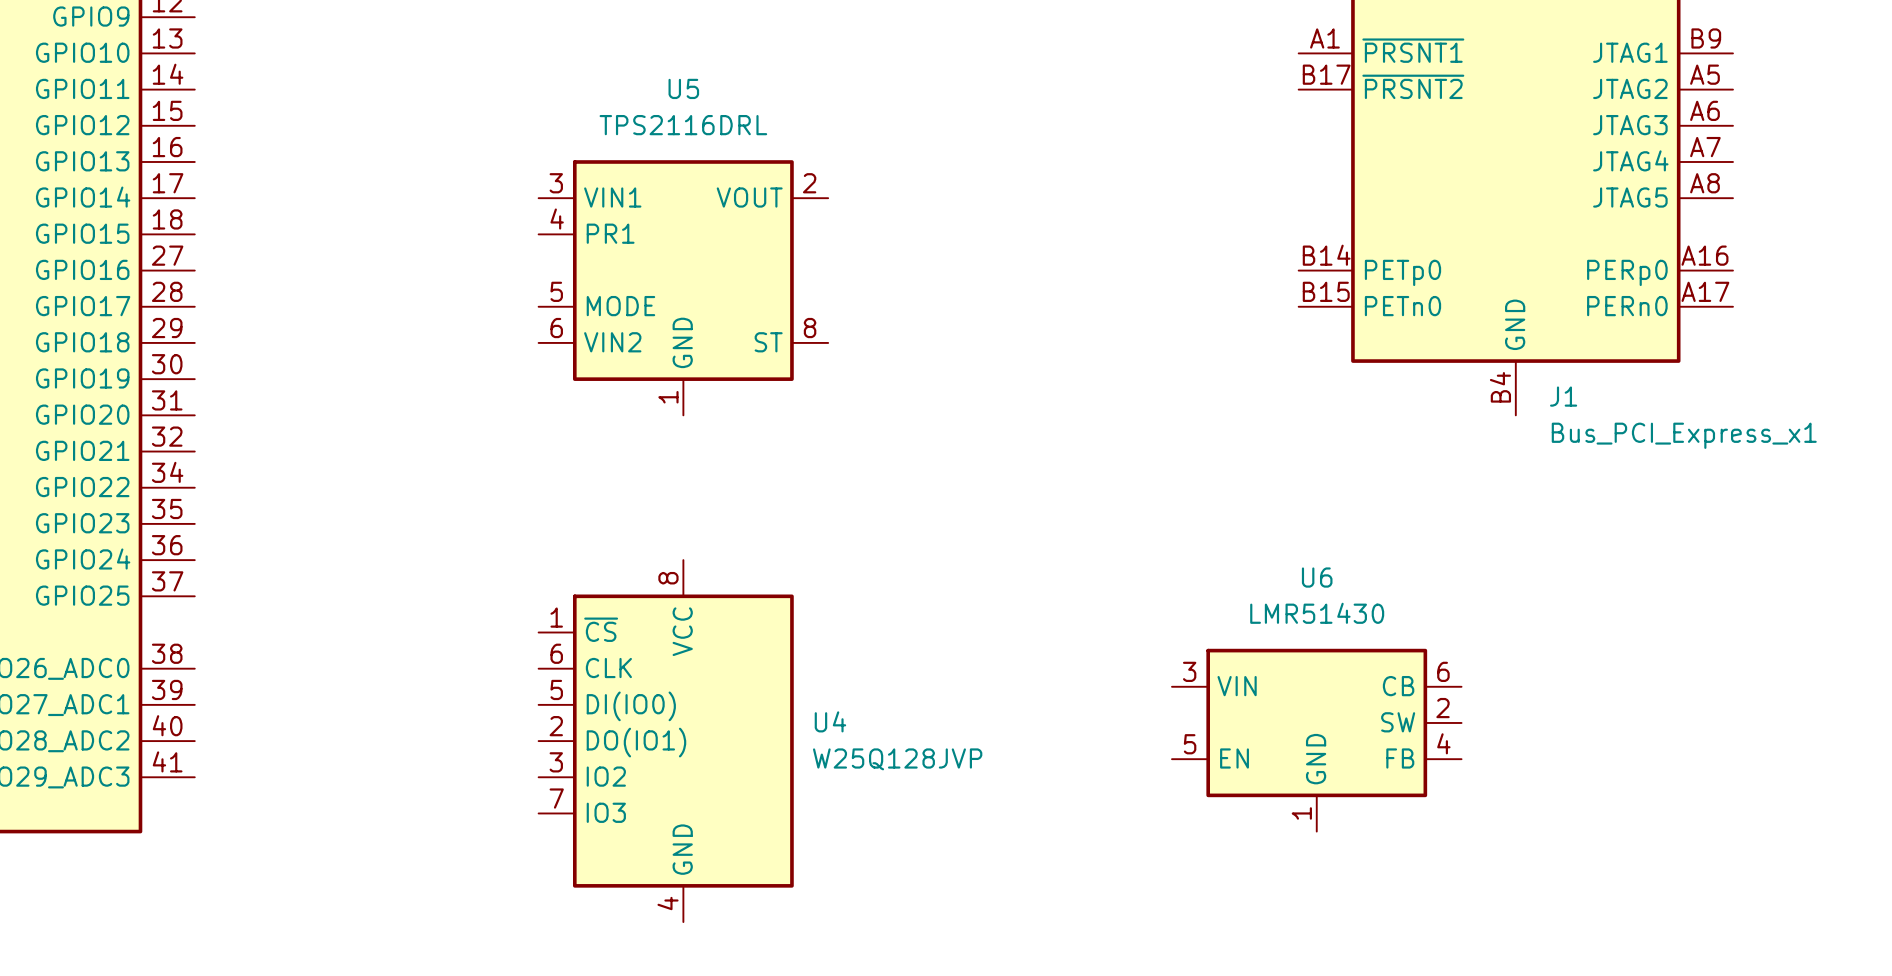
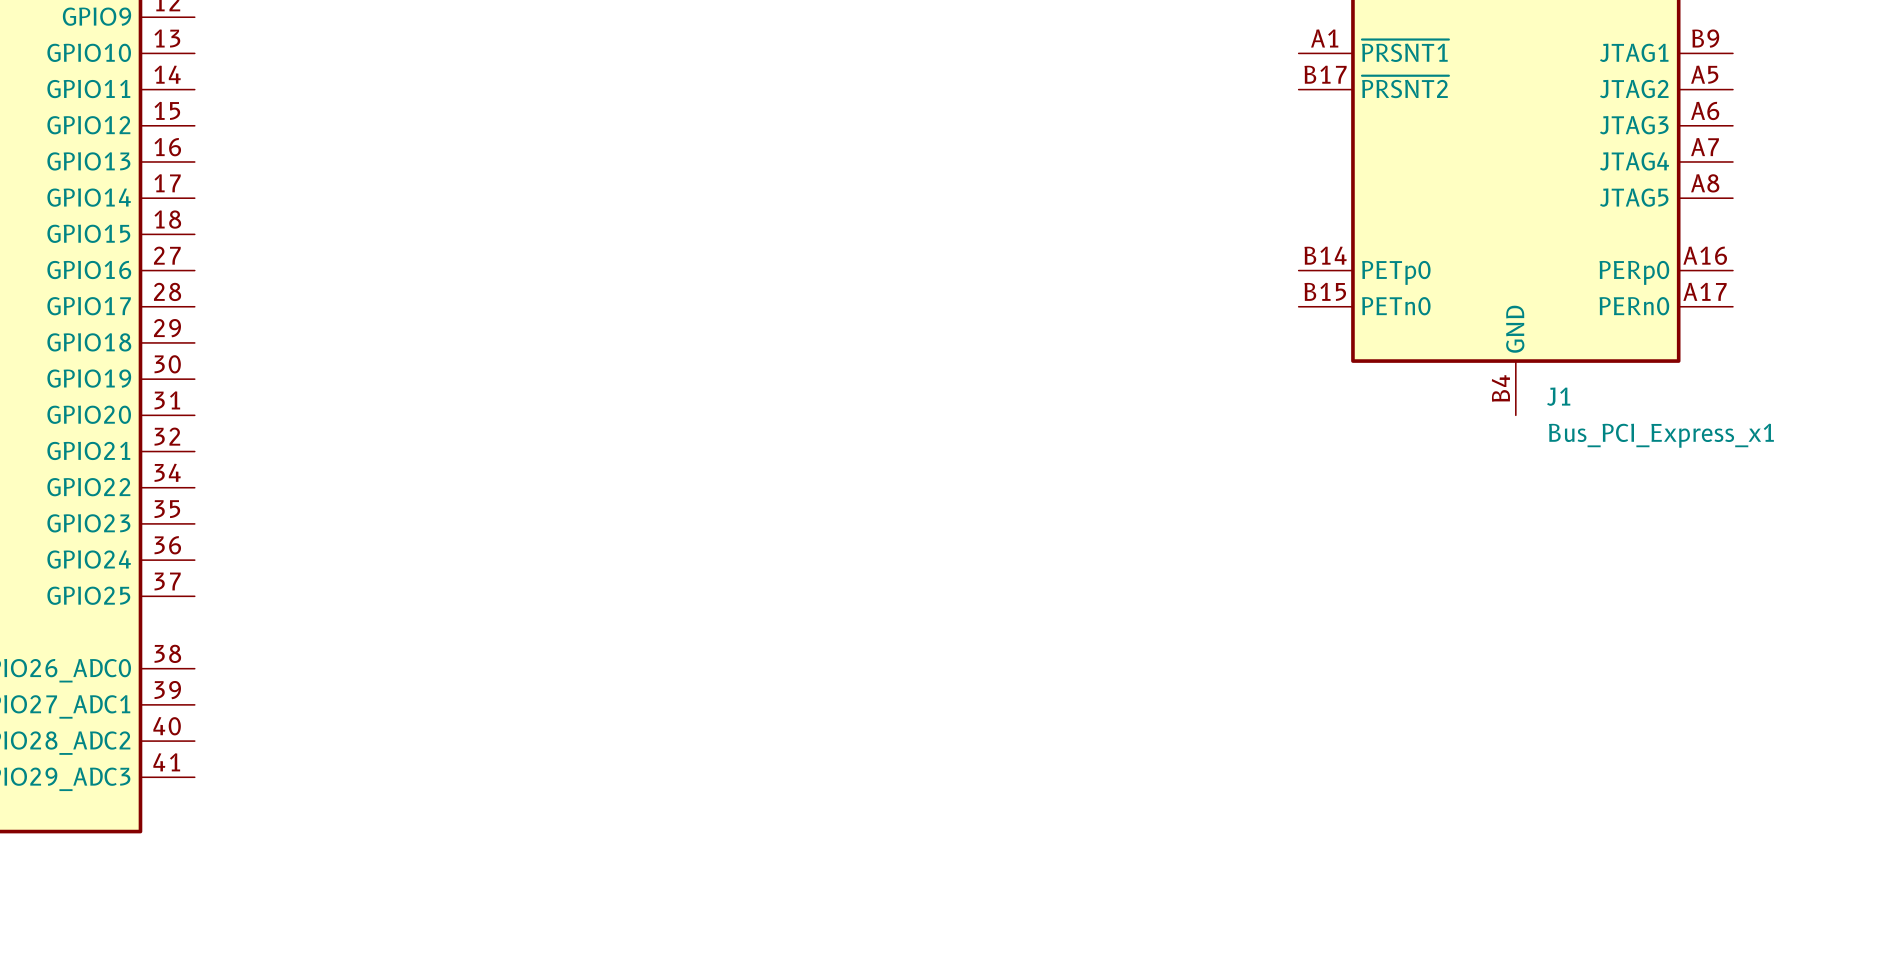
U5: TPS2116DRL (683, 287) -> none
U6: LMR51430 (1316, 740) -> none
U4: W25Q128JVP (666, 741) -> none

